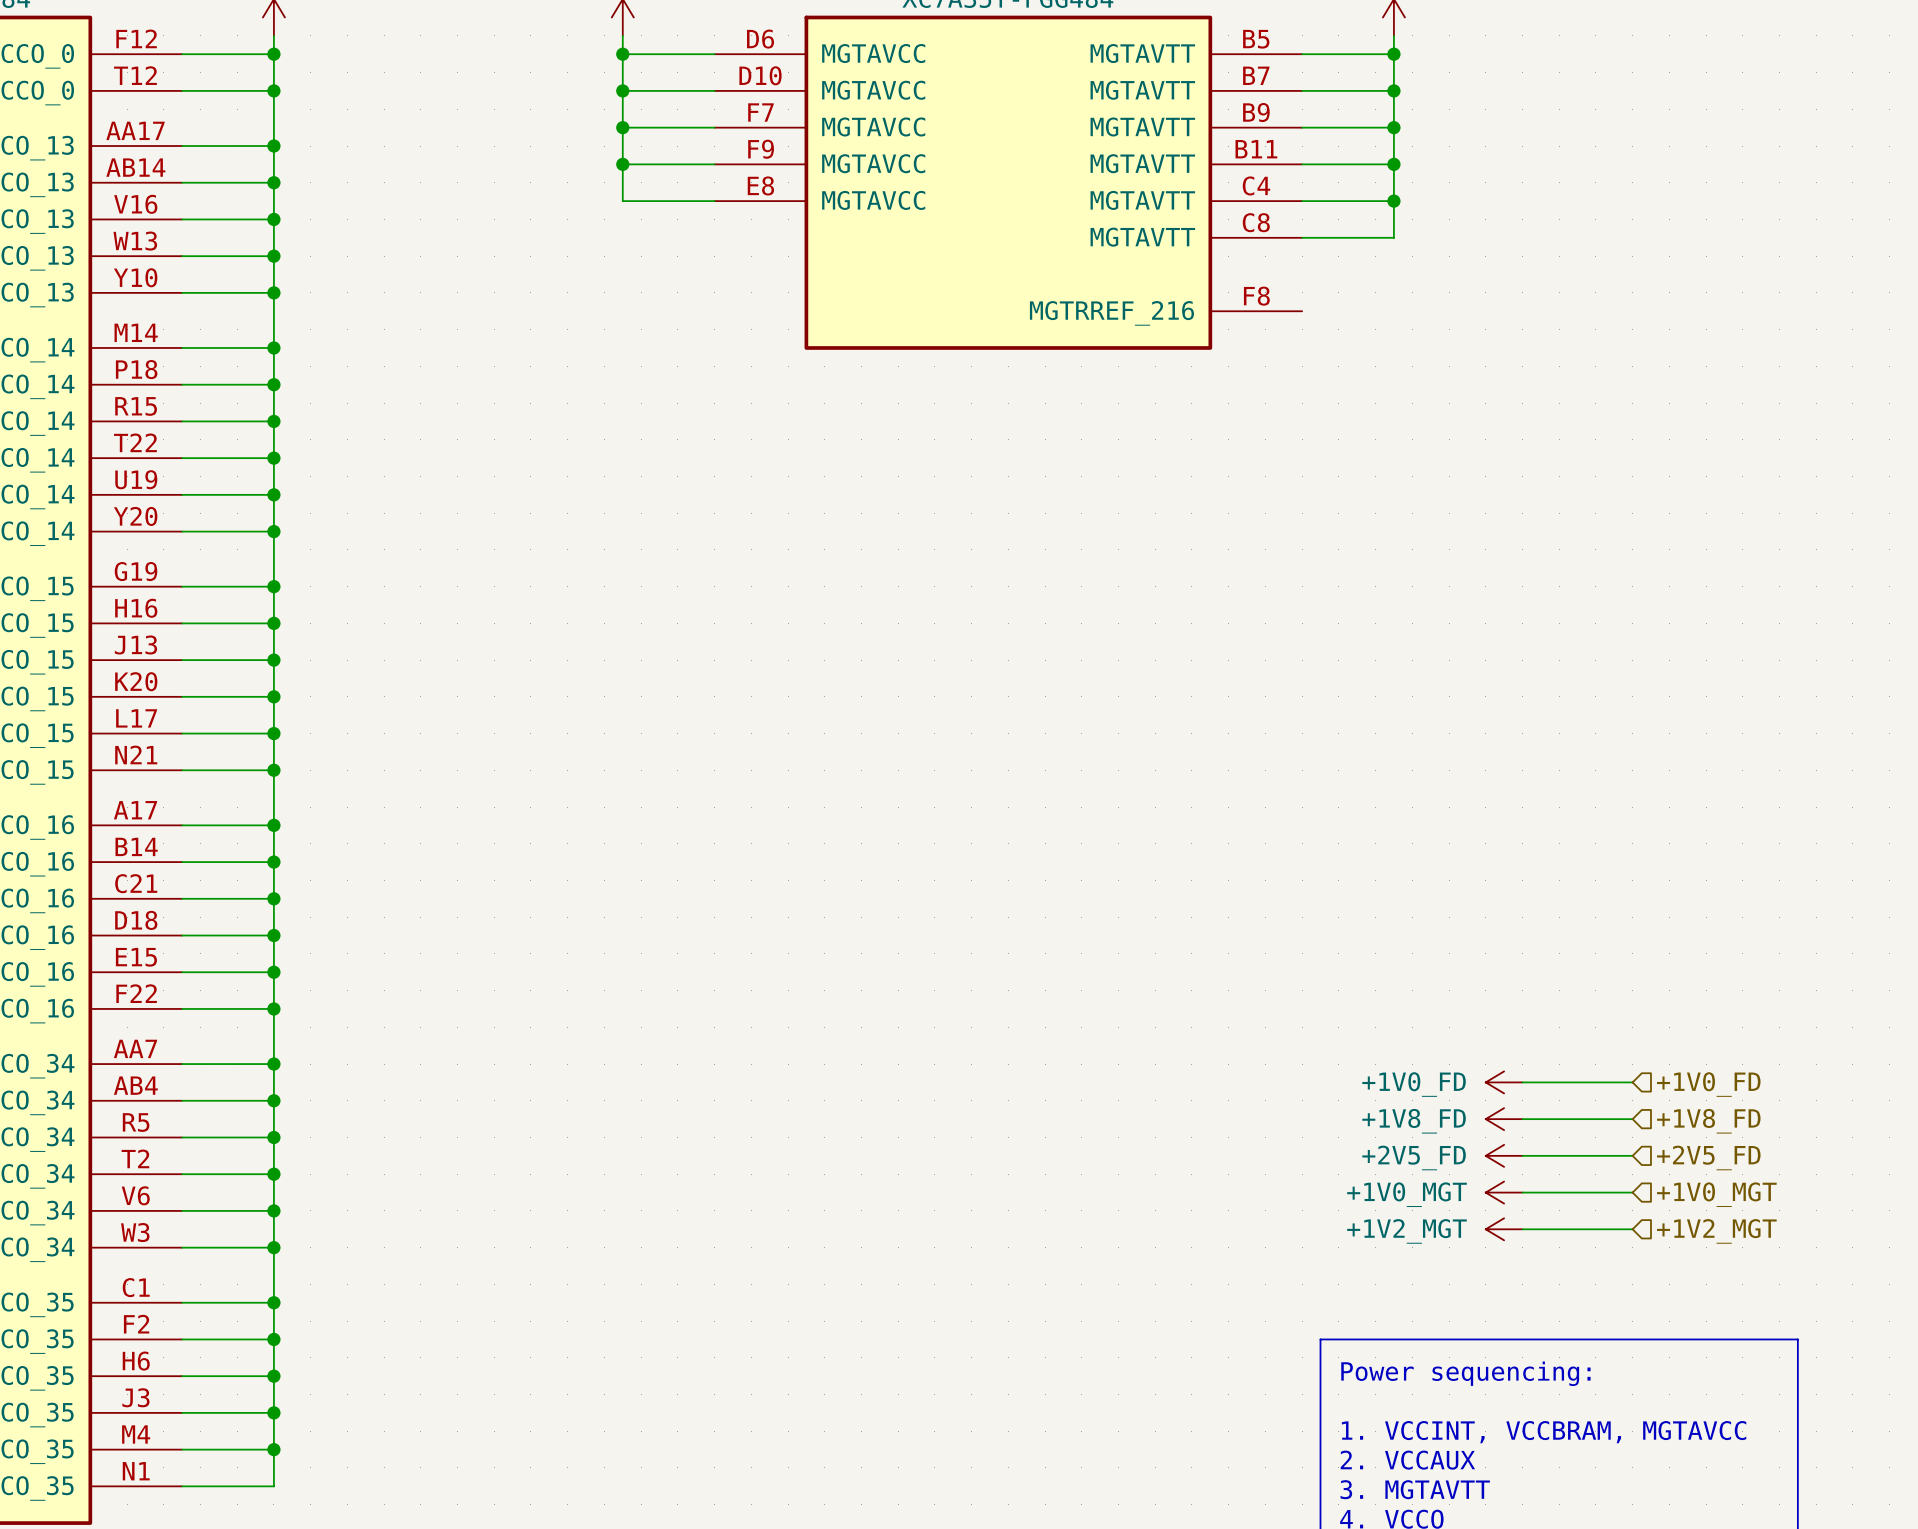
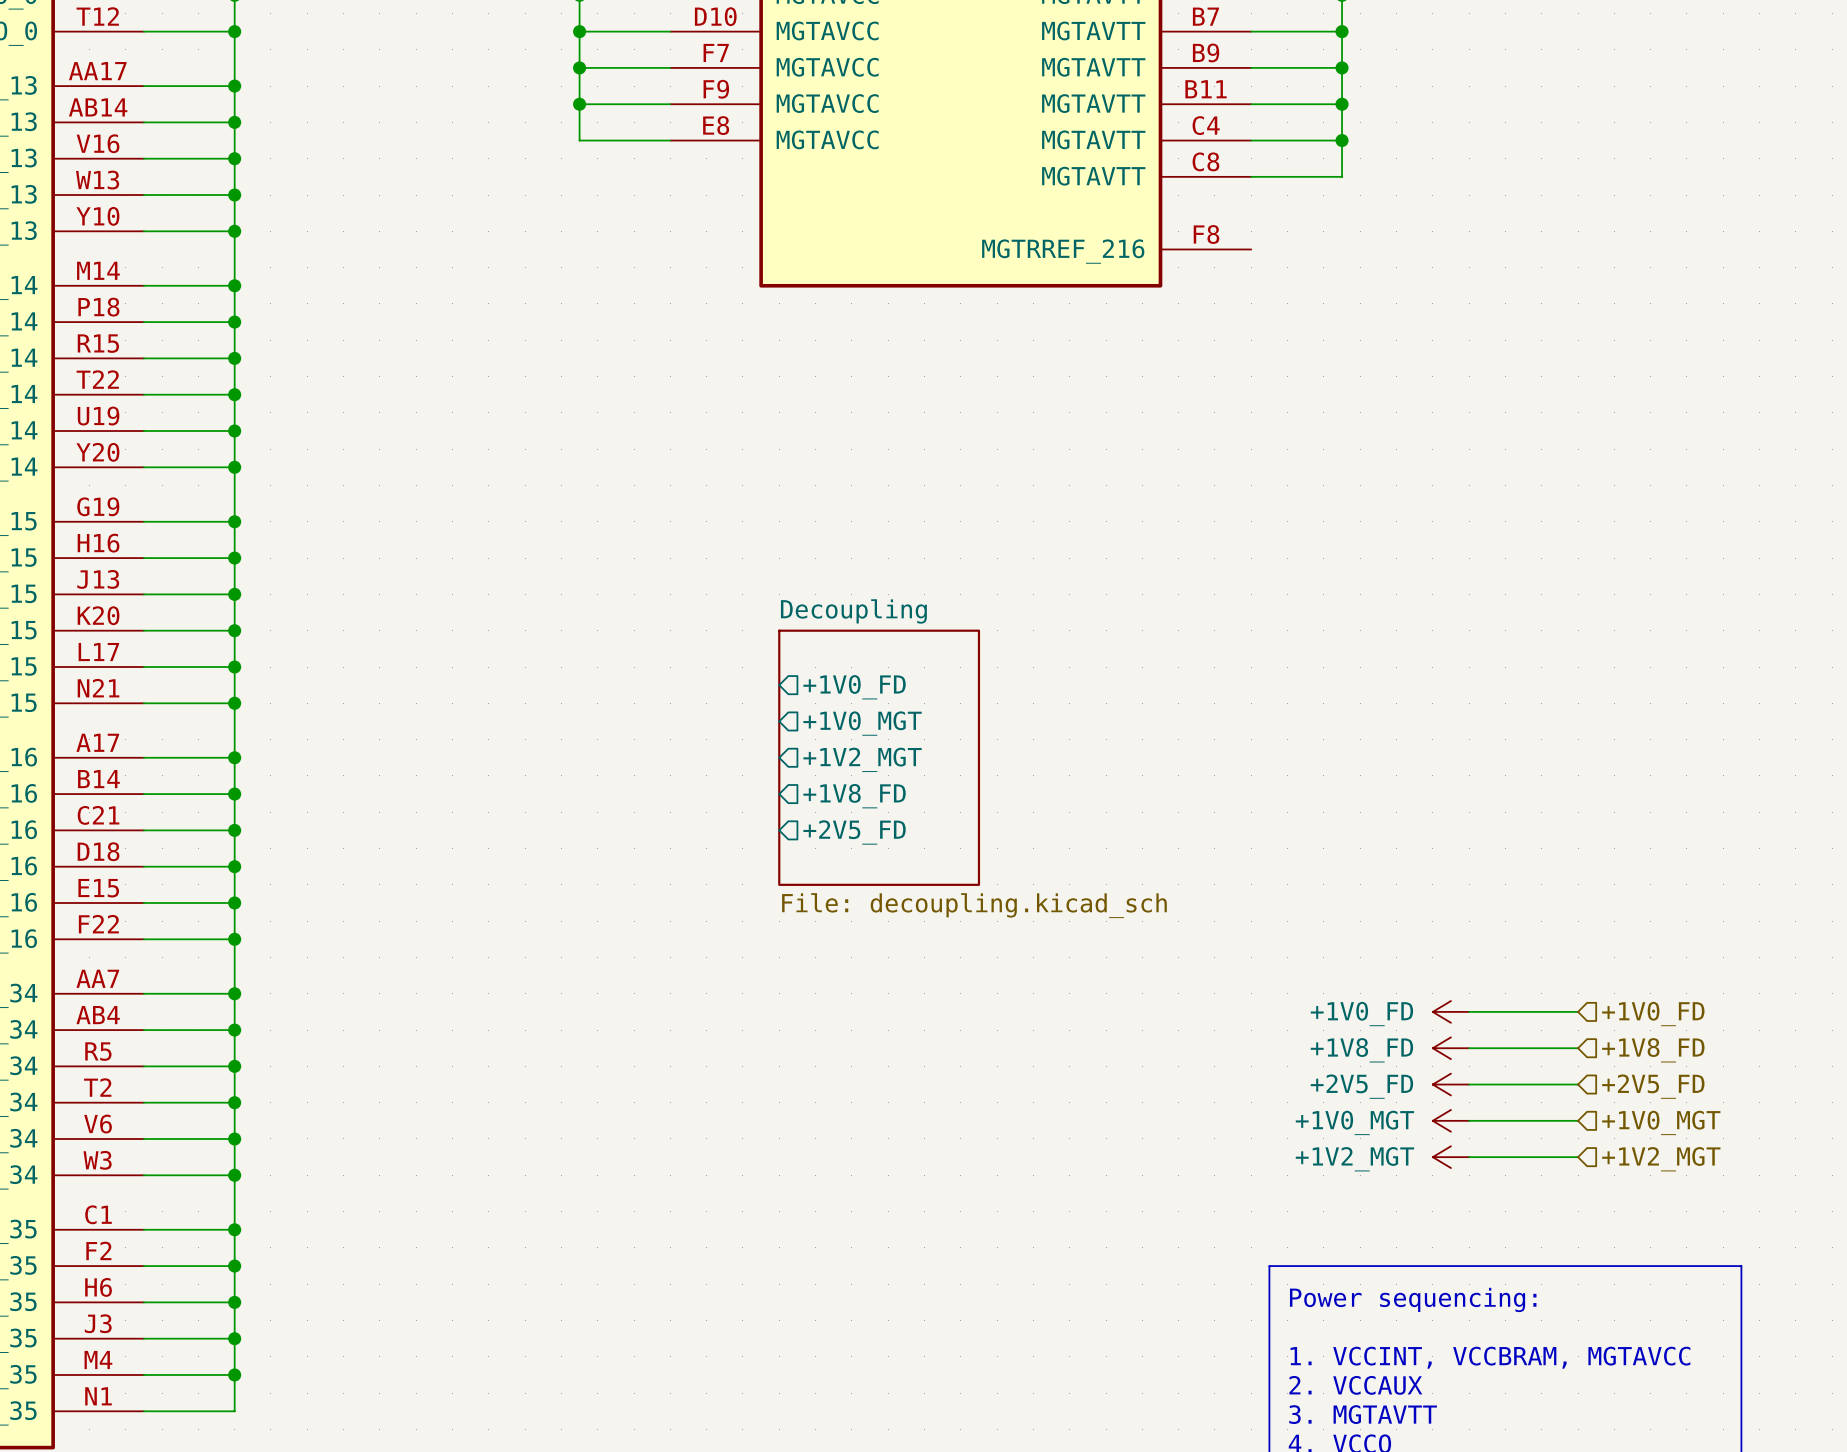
sheet pin: none -> +1V0_FD (854, 687)
sheet pin: none -> +1V0_MGT (862, 723)
sheet Decoupling: none -> File: decoupling.kicad_sch (879, 757)
sheet pin: none -> +1V2_MGT (862, 759)
sheet pin: none -> +1V8_FD (854, 796)
sheet pin: none -> +2V5_FD (854, 832)

